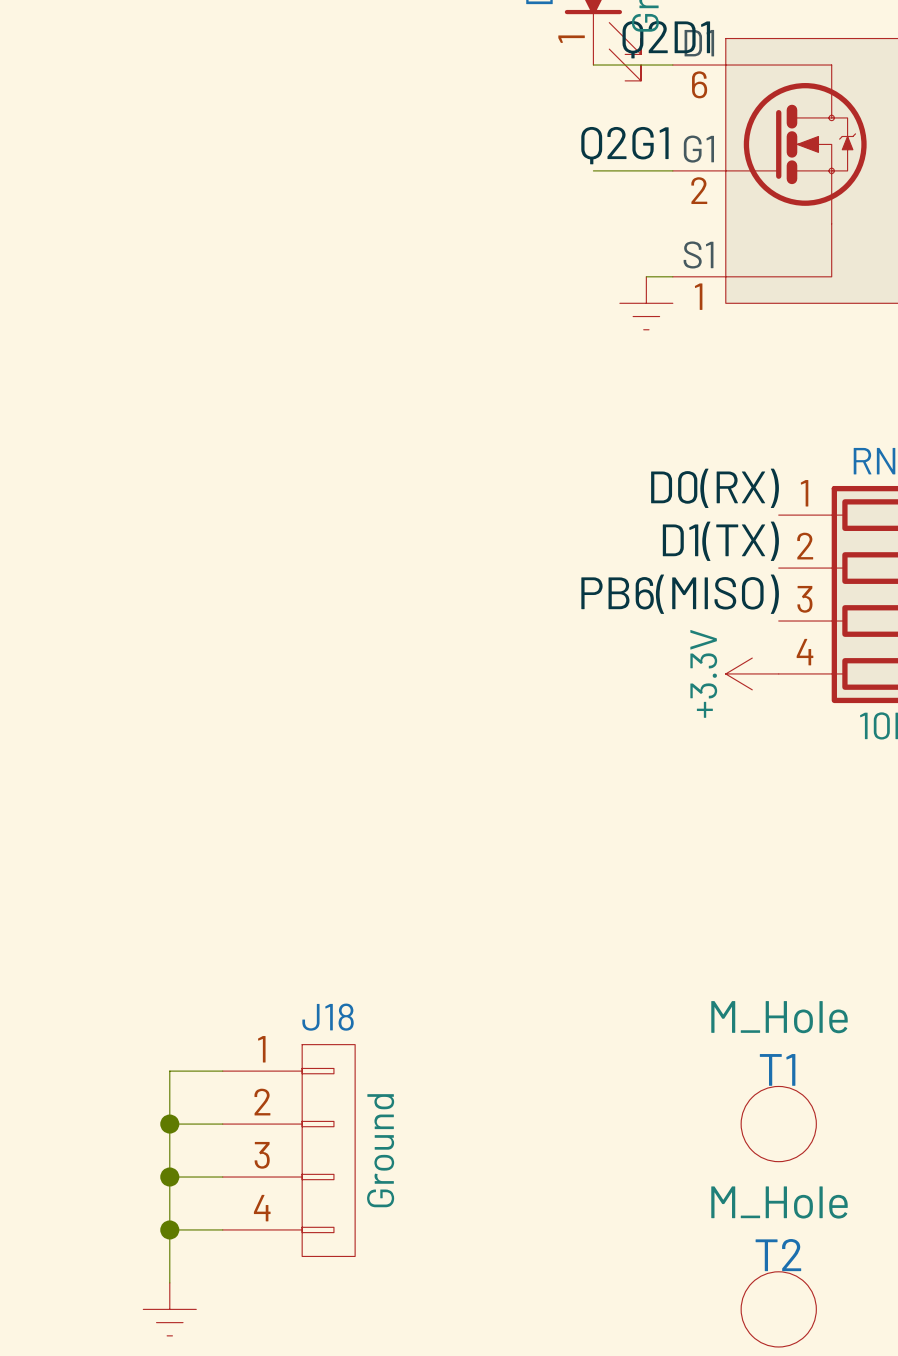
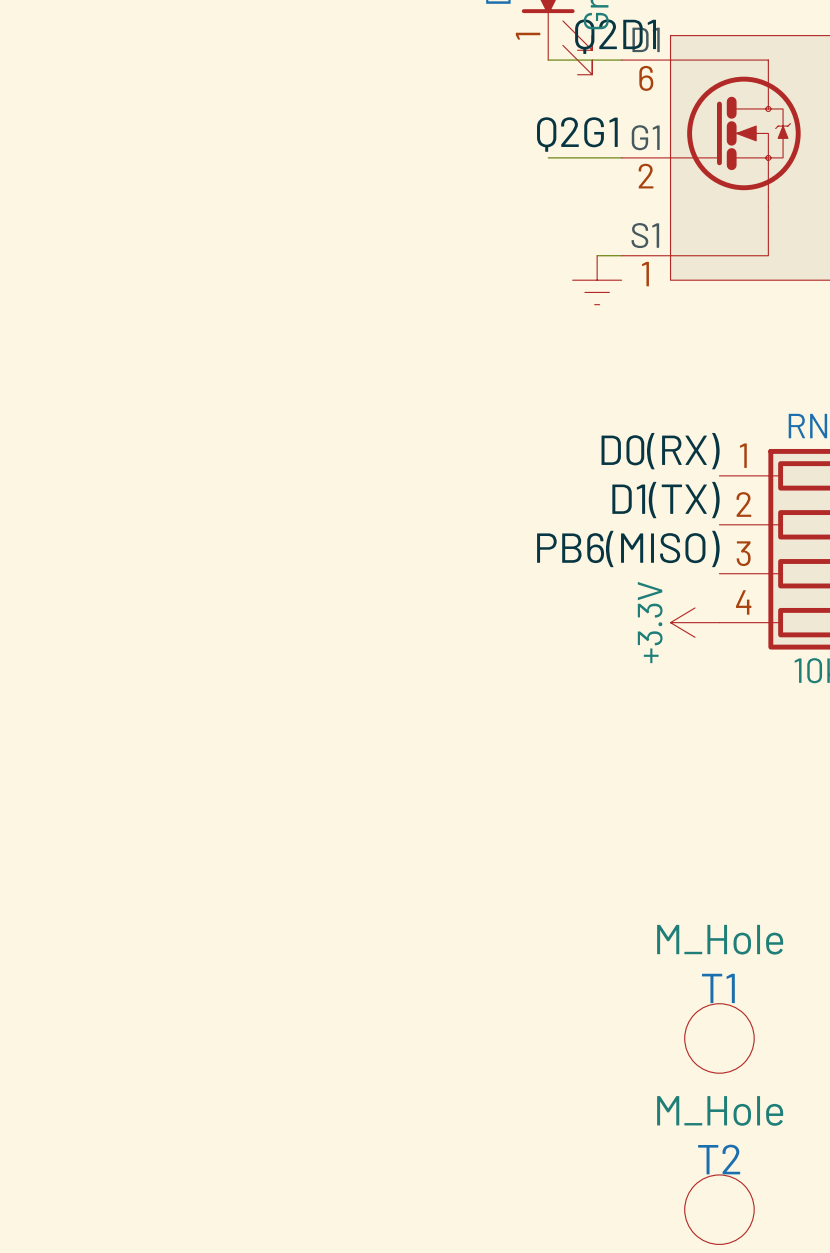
wire: (222, 1071) (169, 1071) (169, 1282) -> none
wire: (169, 1124) (222, 1124) -> none
junction: (169, 1124) -> none
J18: Ground (288, 1150) -> none
wire: (169, 1177) (222, 1177) -> none
junction: (169, 1177) -> none
wire: (169, 1229) (222, 1229) -> none
junction: (169, 1229) -> none
power symbol: (169, 1309) -> none

